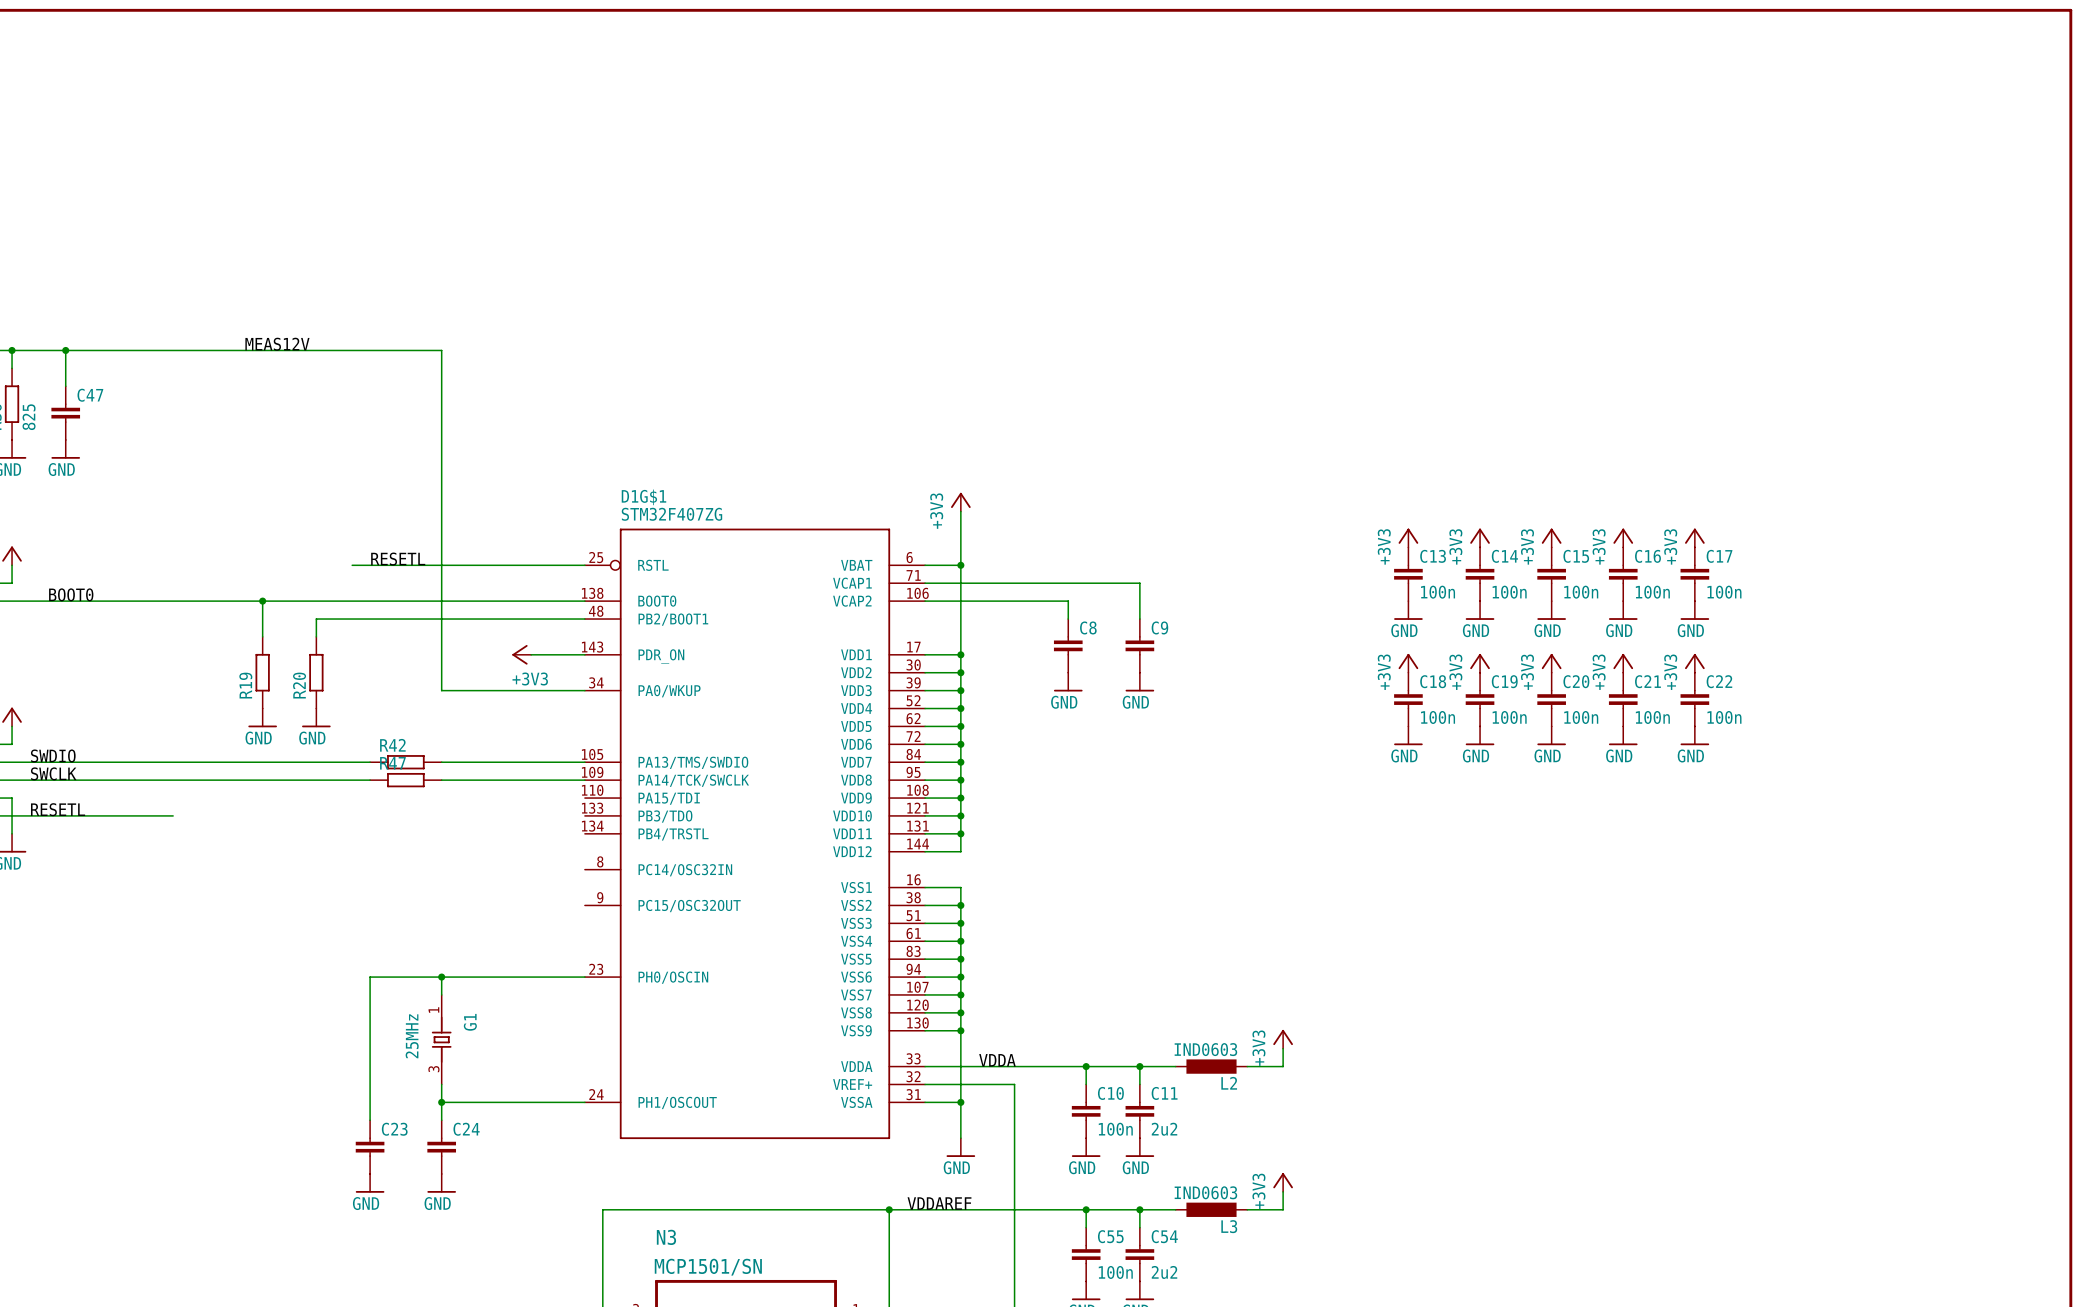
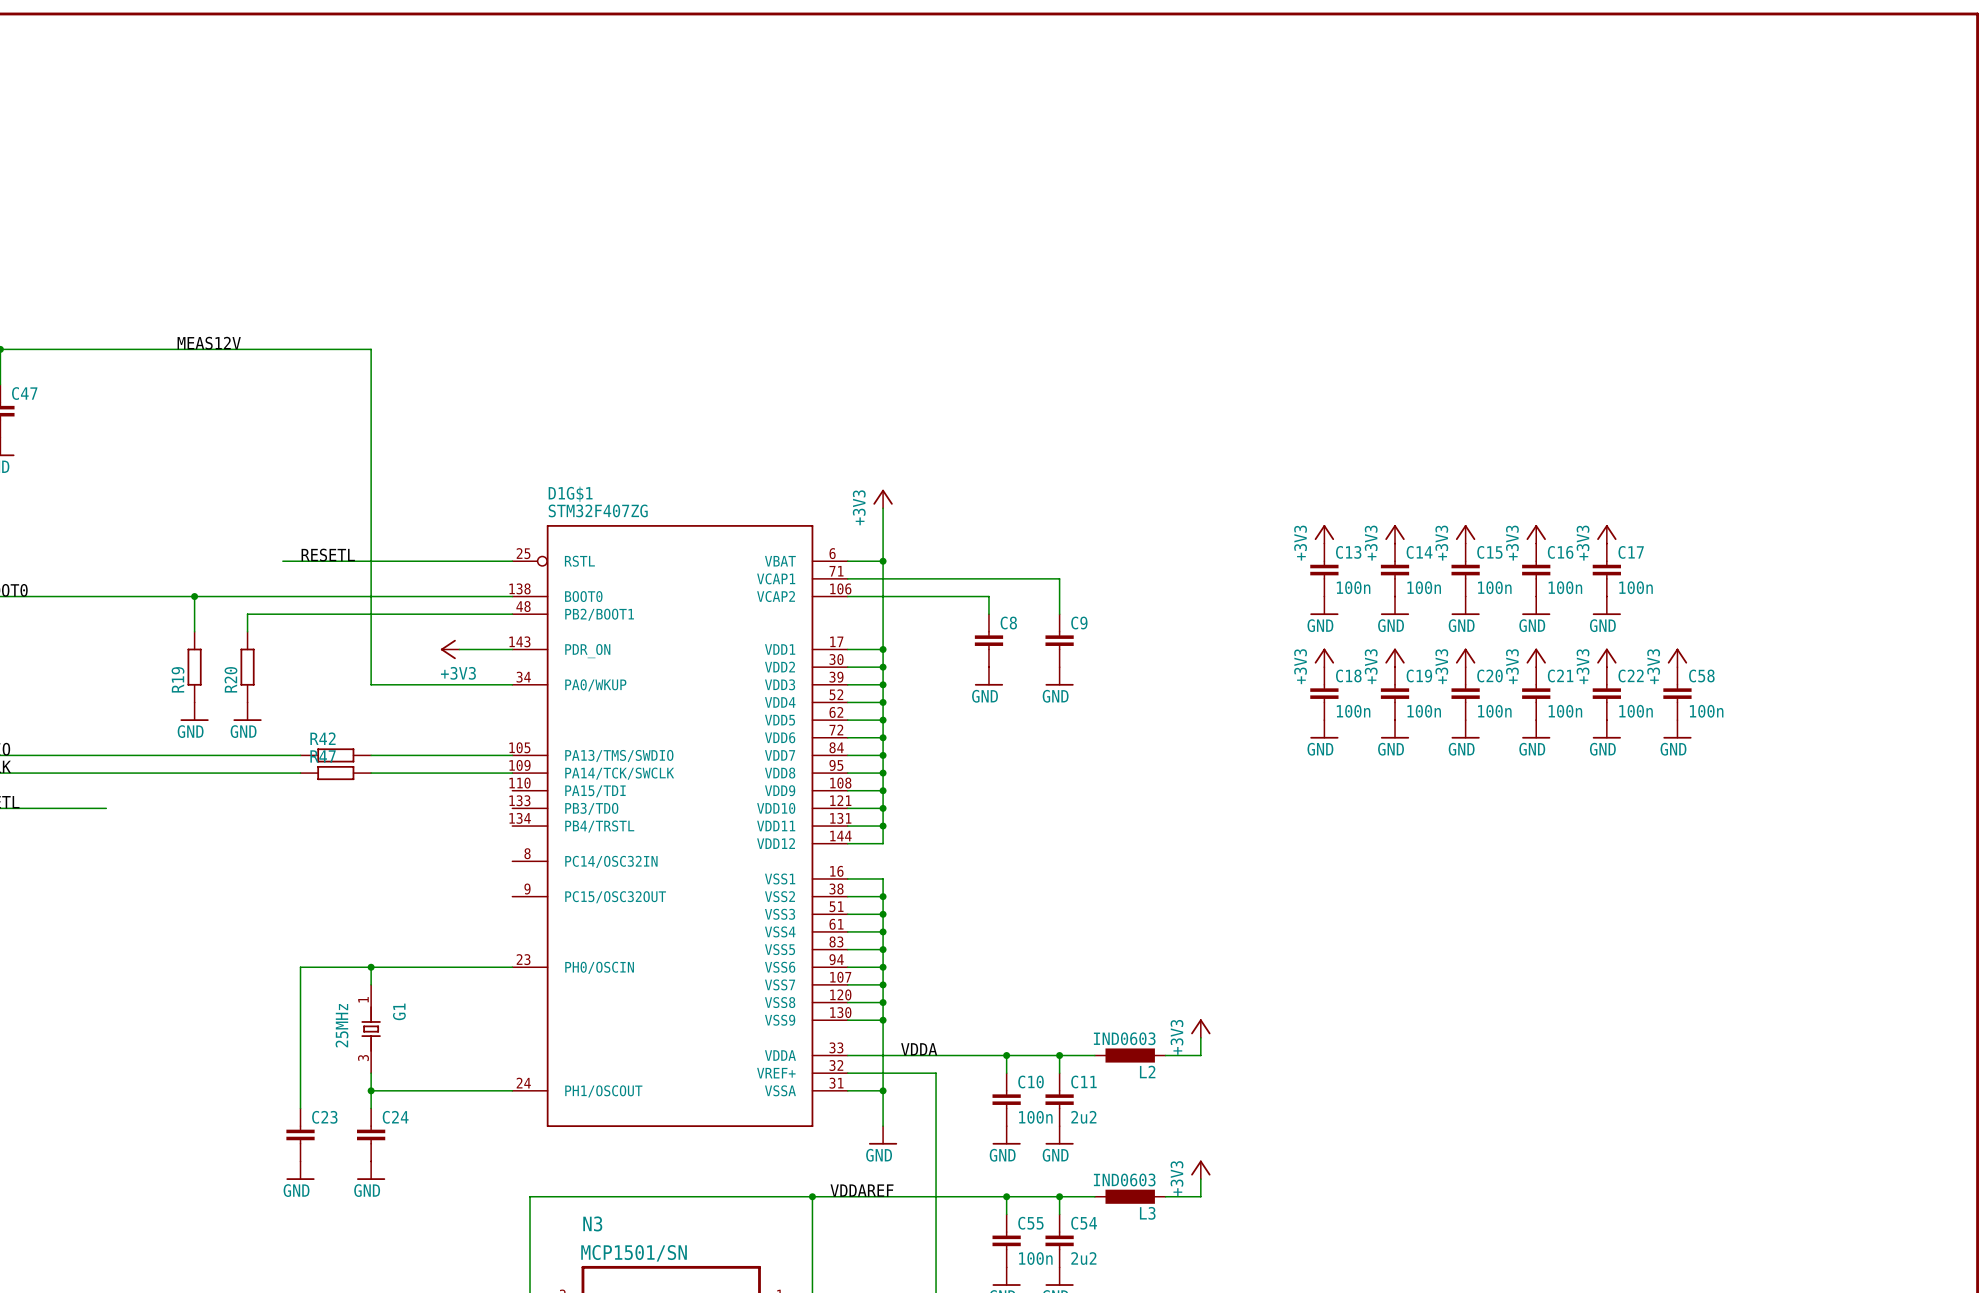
power symbol: none -> +3V3 (1677, 657)
C58: none -> 100n (1677, 693)
power symbol: none -> GND (1677, 729)

